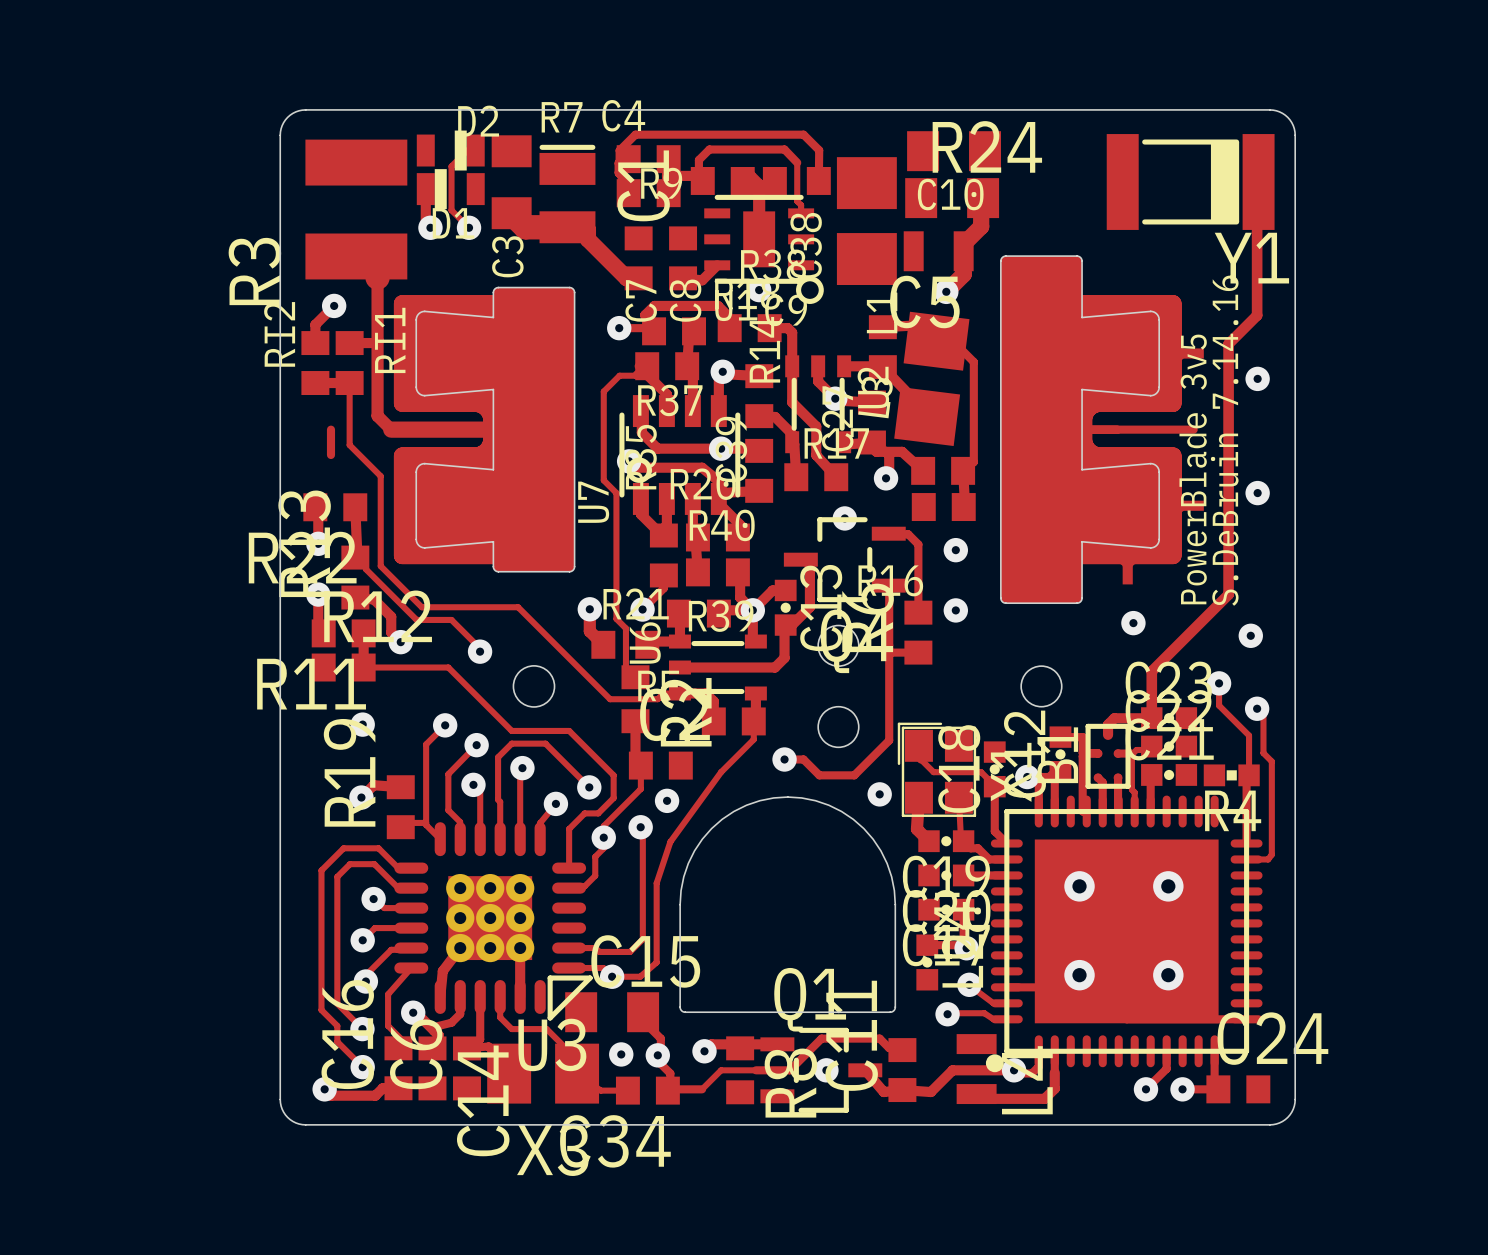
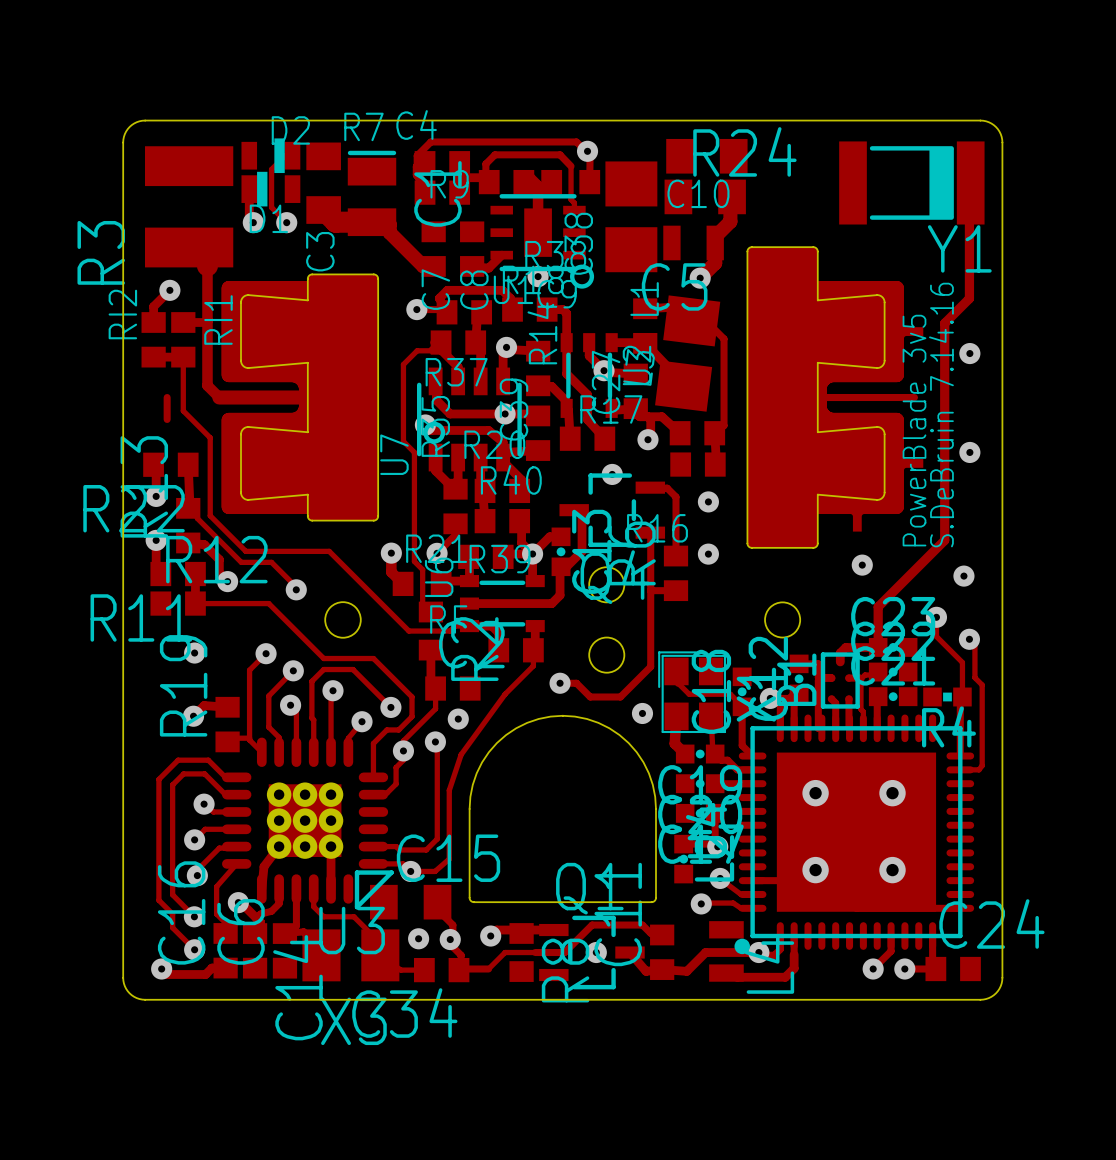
via: none -> (587, 151)

